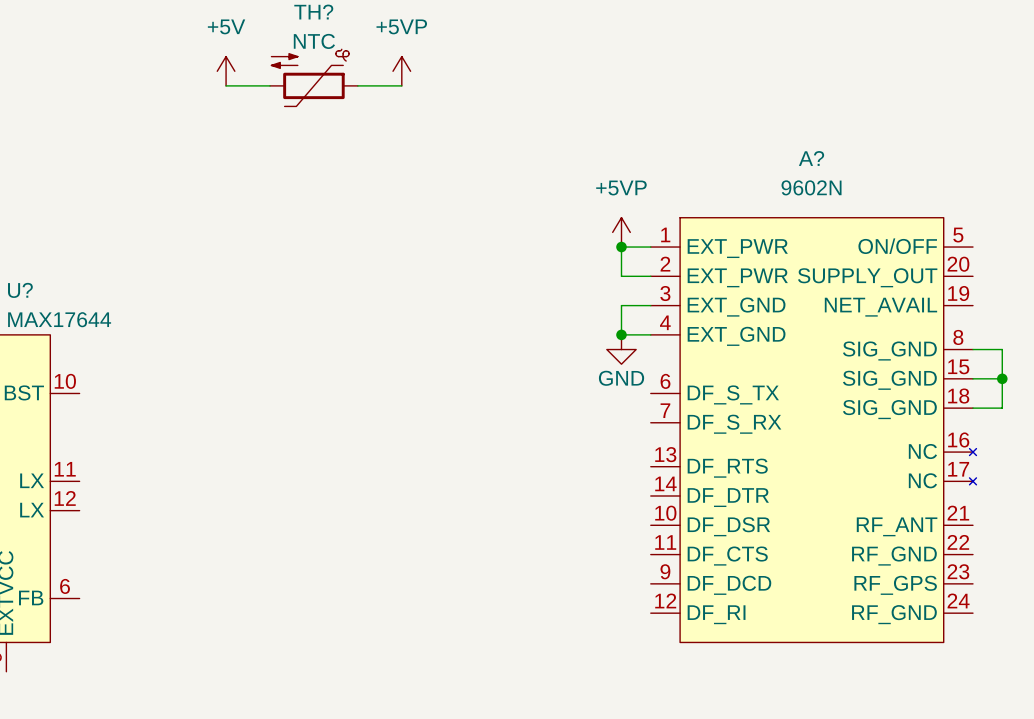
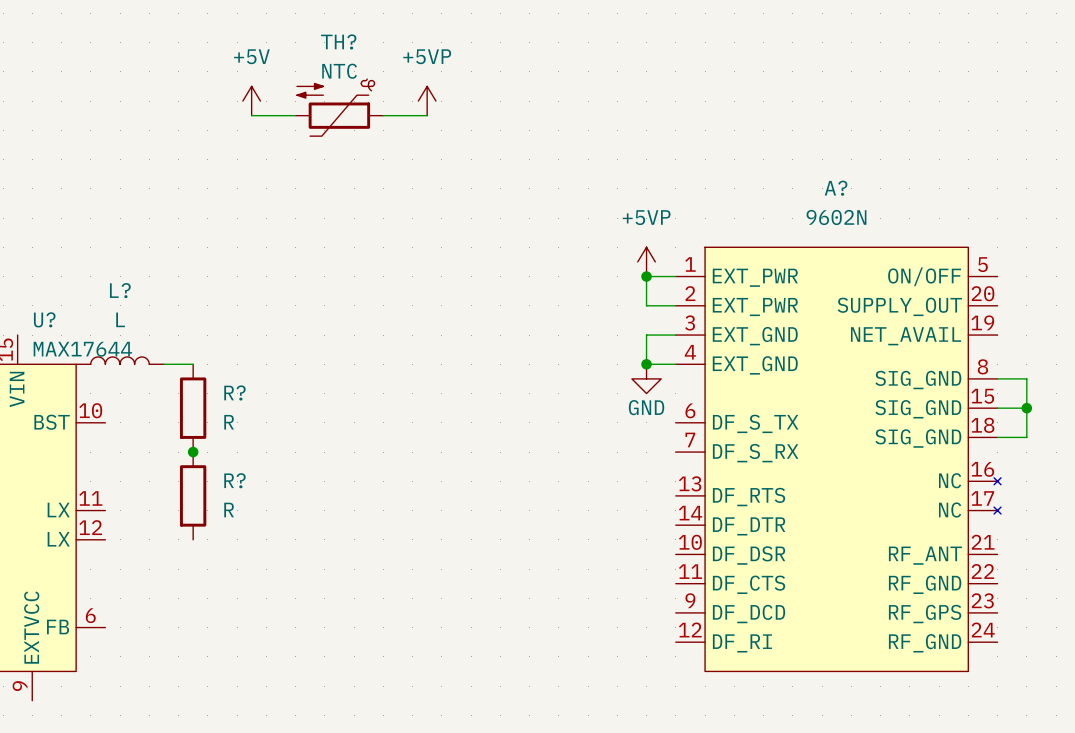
L?: none -> L (120, 360)
wire: none -> (163, 364) (193, 364)
R?: none -> R (193, 408)
junction: none -> (193, 452)
R?: none -> R (193, 495)

